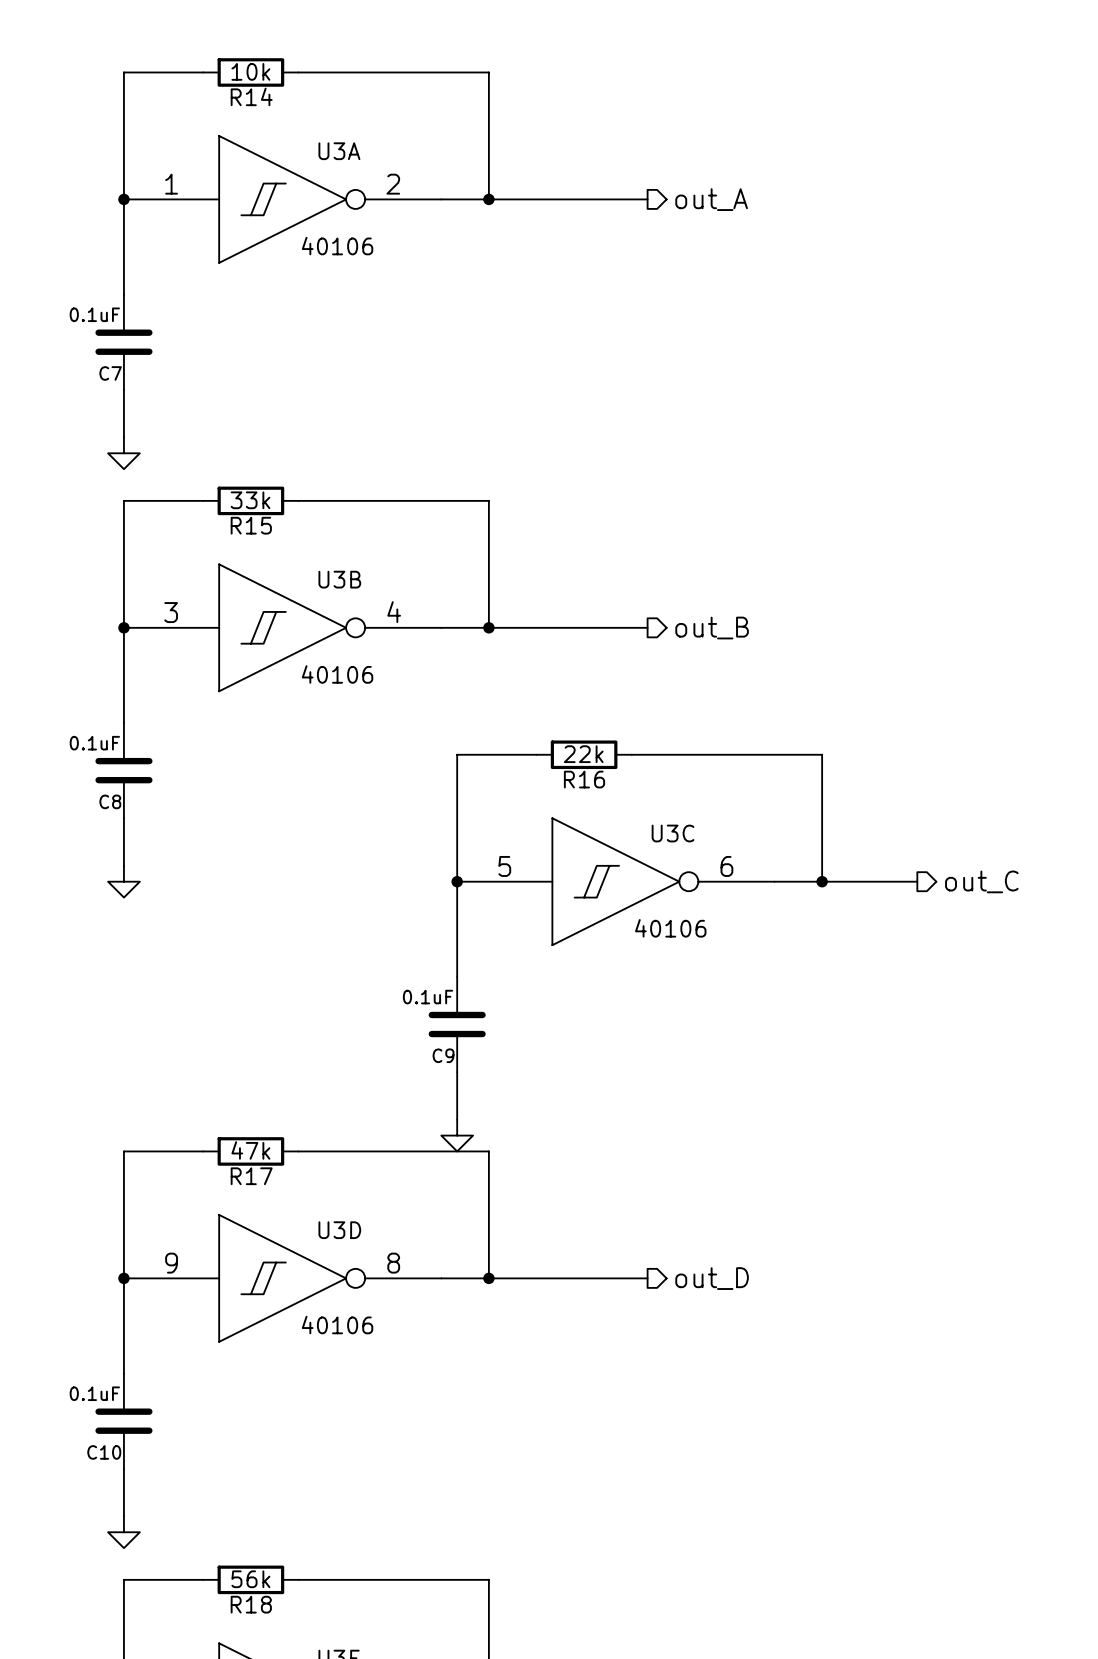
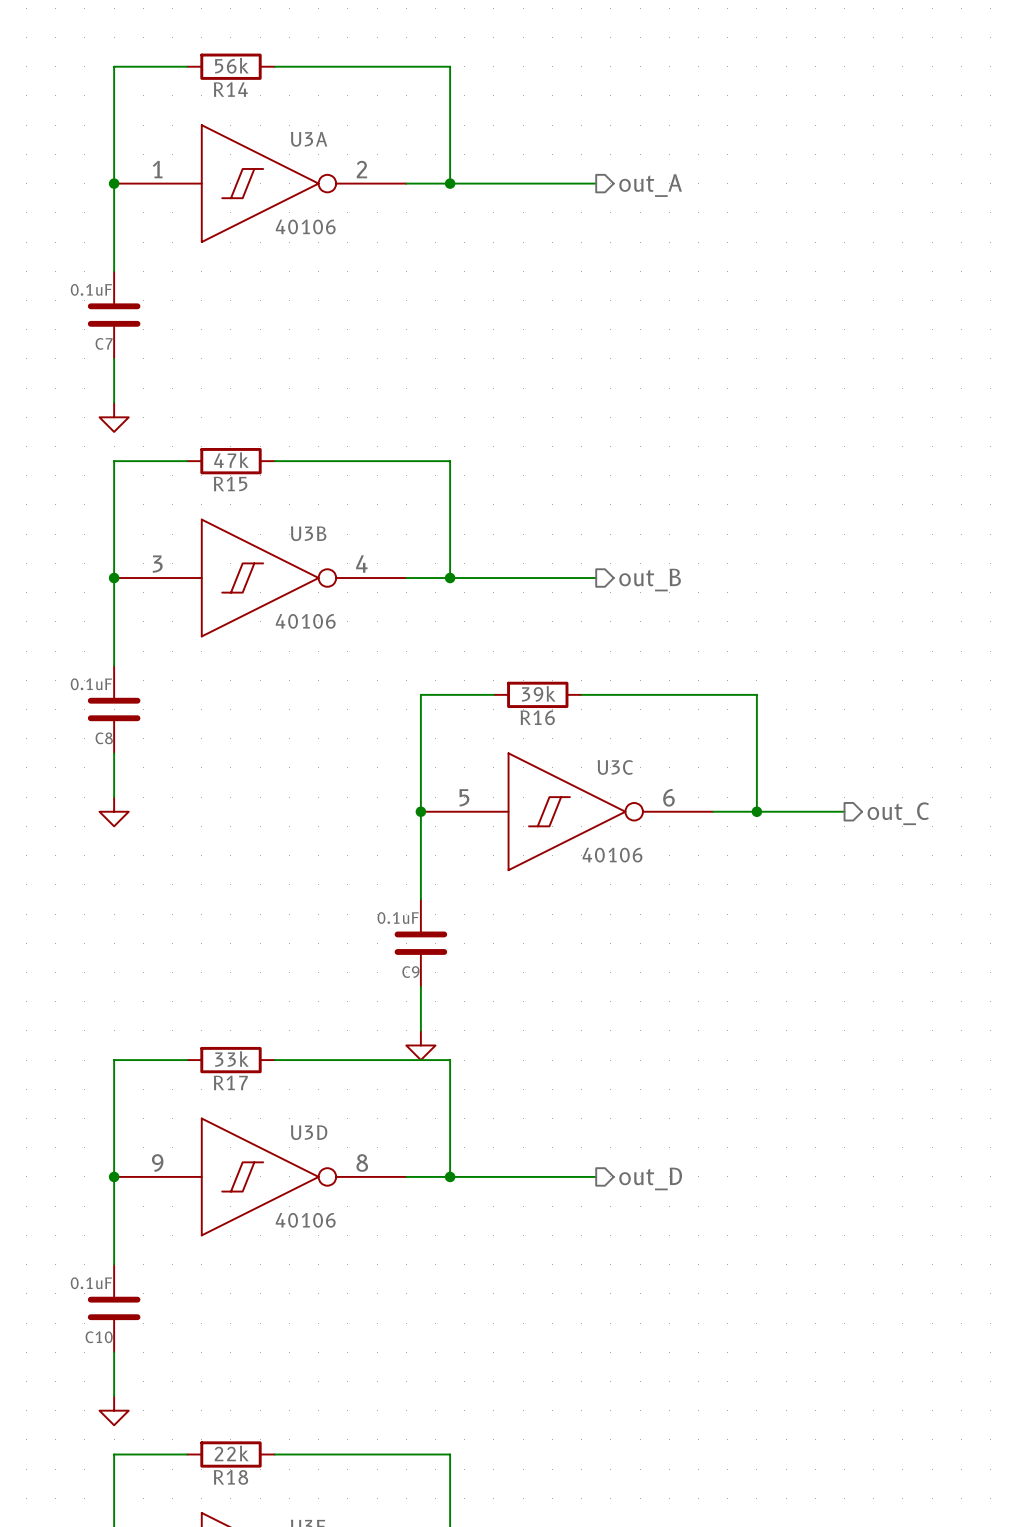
R14 value: 10k (250, 71) -> 56k (231, 65)
R15 value: 33k (250, 500) -> 47k (231, 460)
R16 value: 22k (583, 754) -> 39k (538, 693)
R17 value: 47k (250, 1150) -> 33k (231, 1059)
R18 value: 56k (250, 1579) -> 22k (231, 1453)

